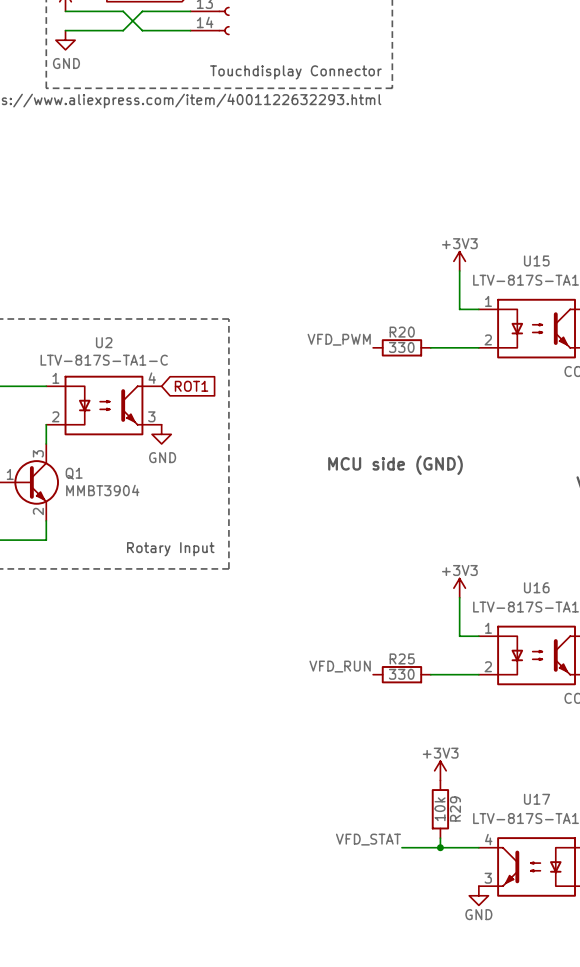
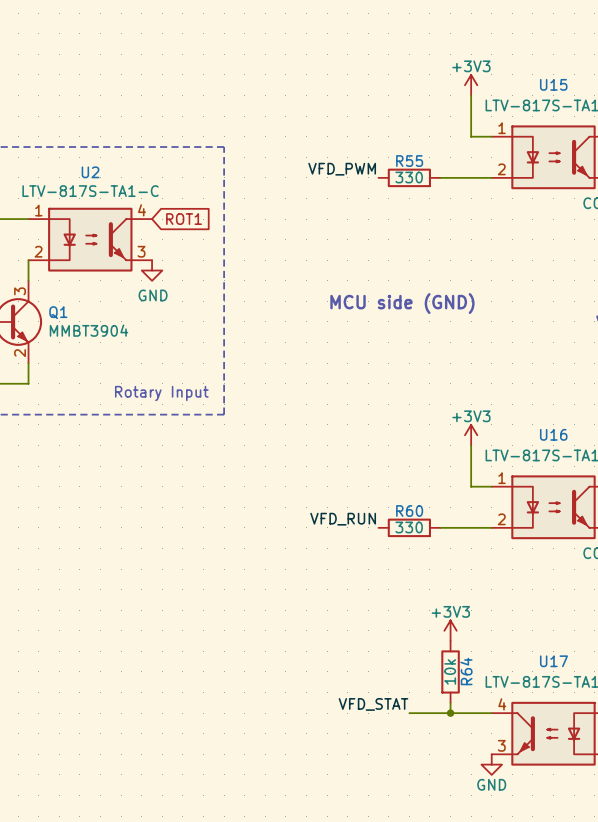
R20 name: R20 (402, 332) -> R55 (409, 161)
R25 name: R25 (402, 658) -> R60 (409, 511)
R29 name: R29 (455, 809) -> R64 (466, 671)

